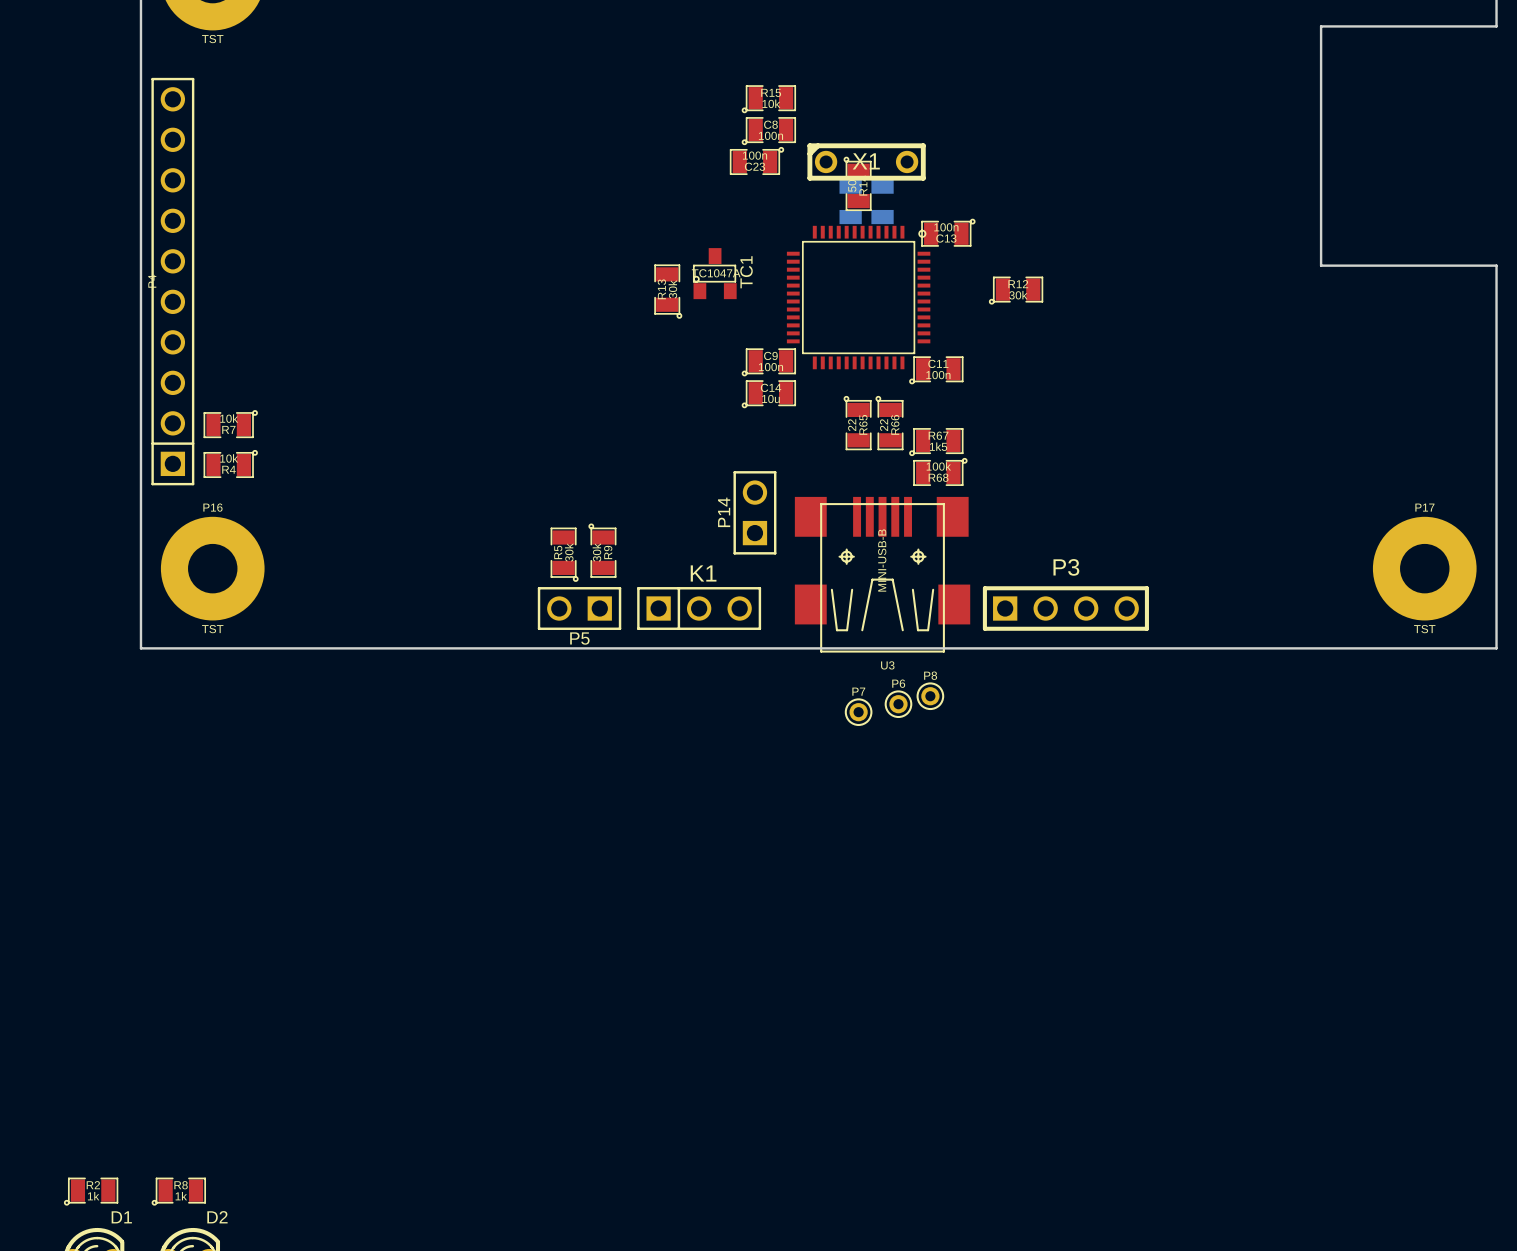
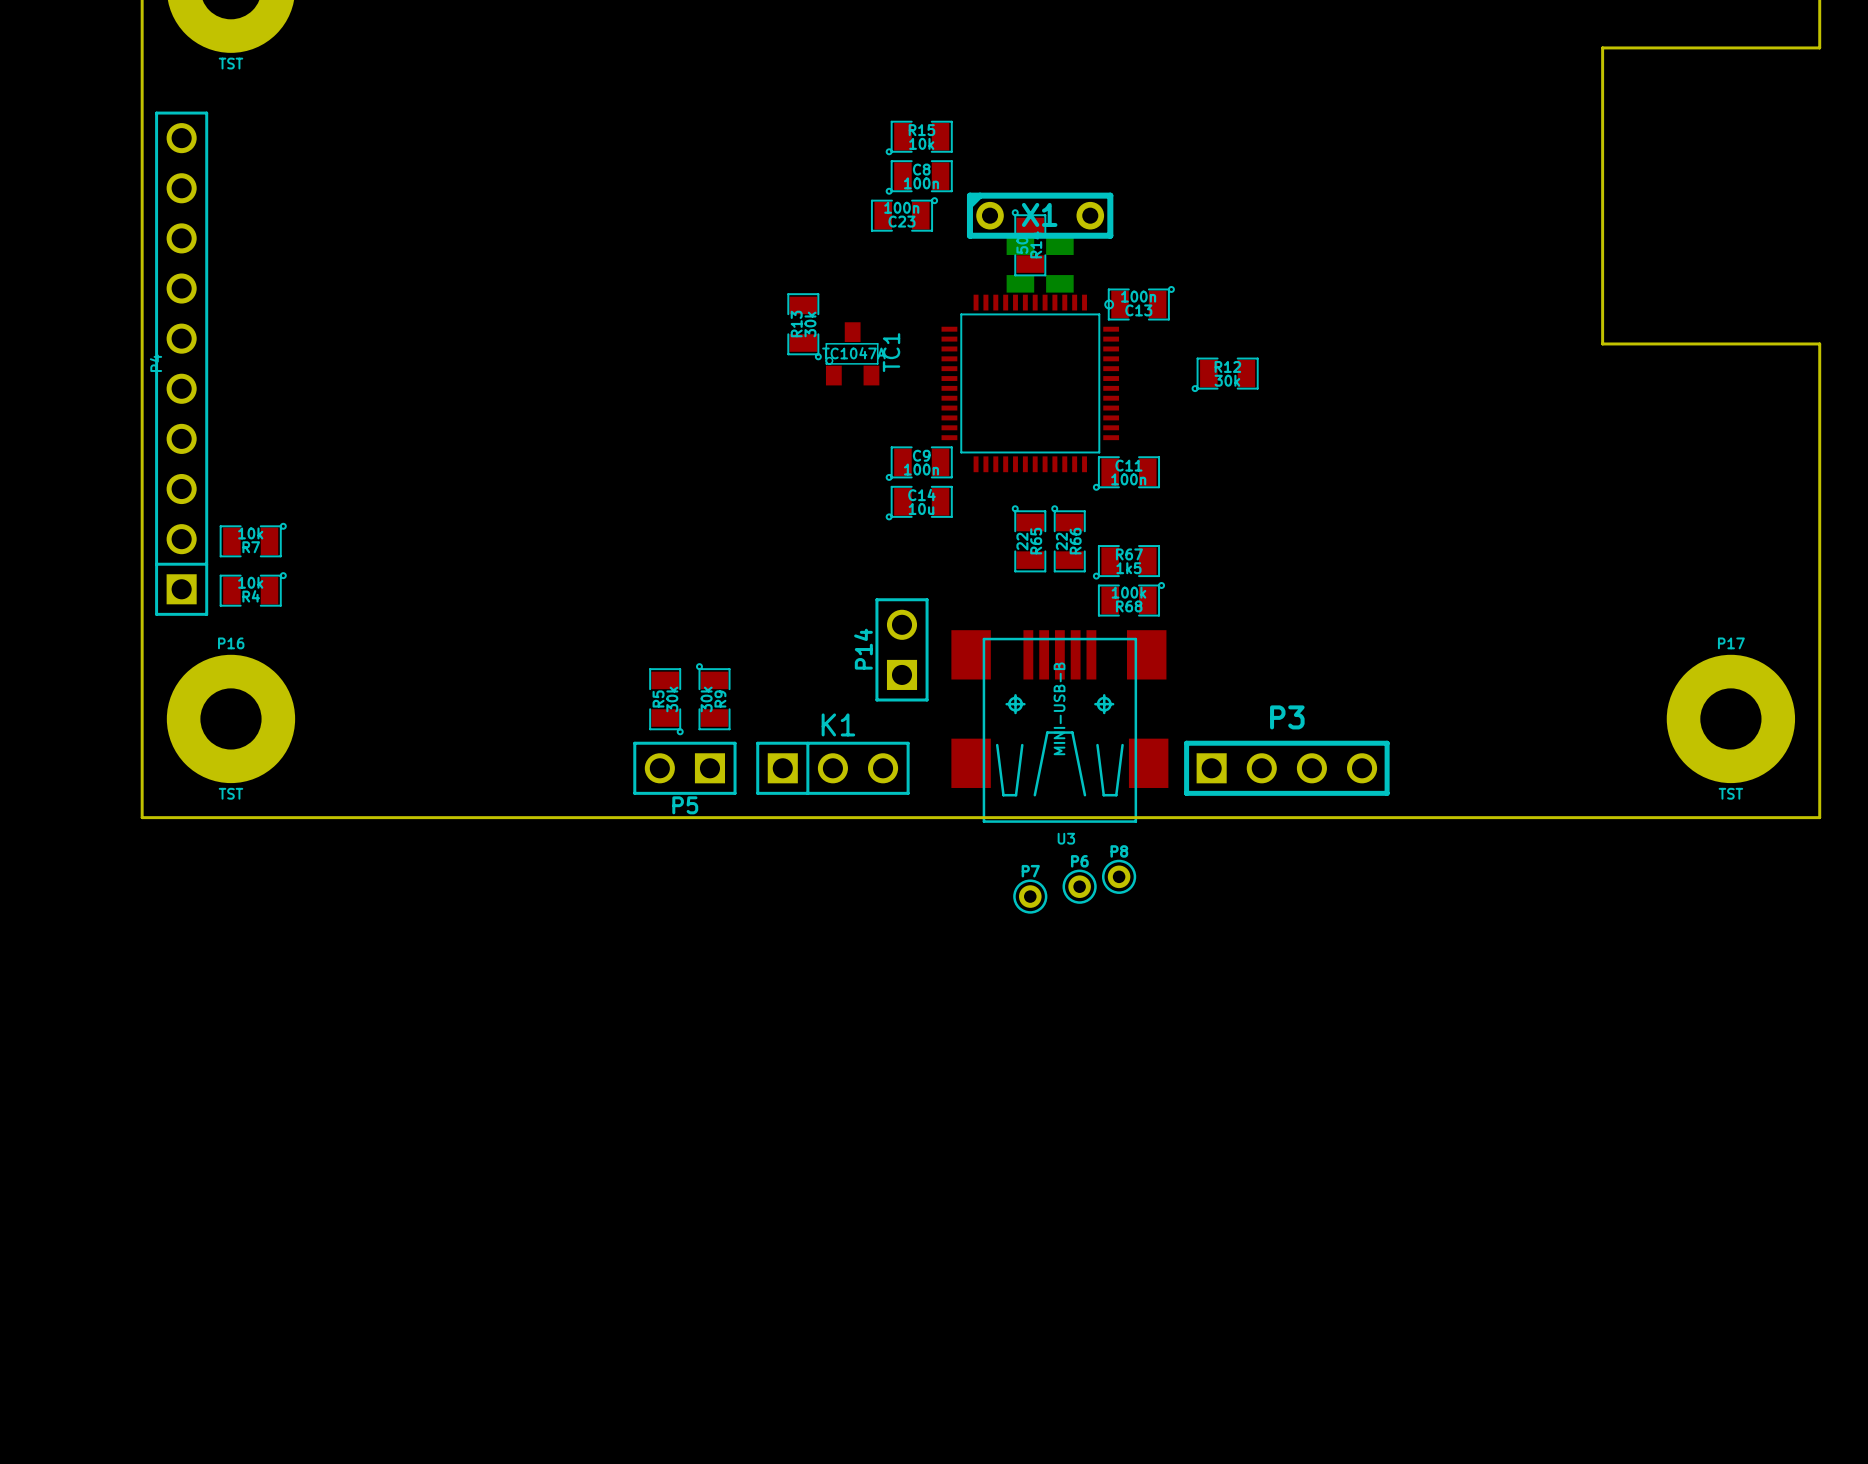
R13 position: (668, 291) -> (804, 326)

